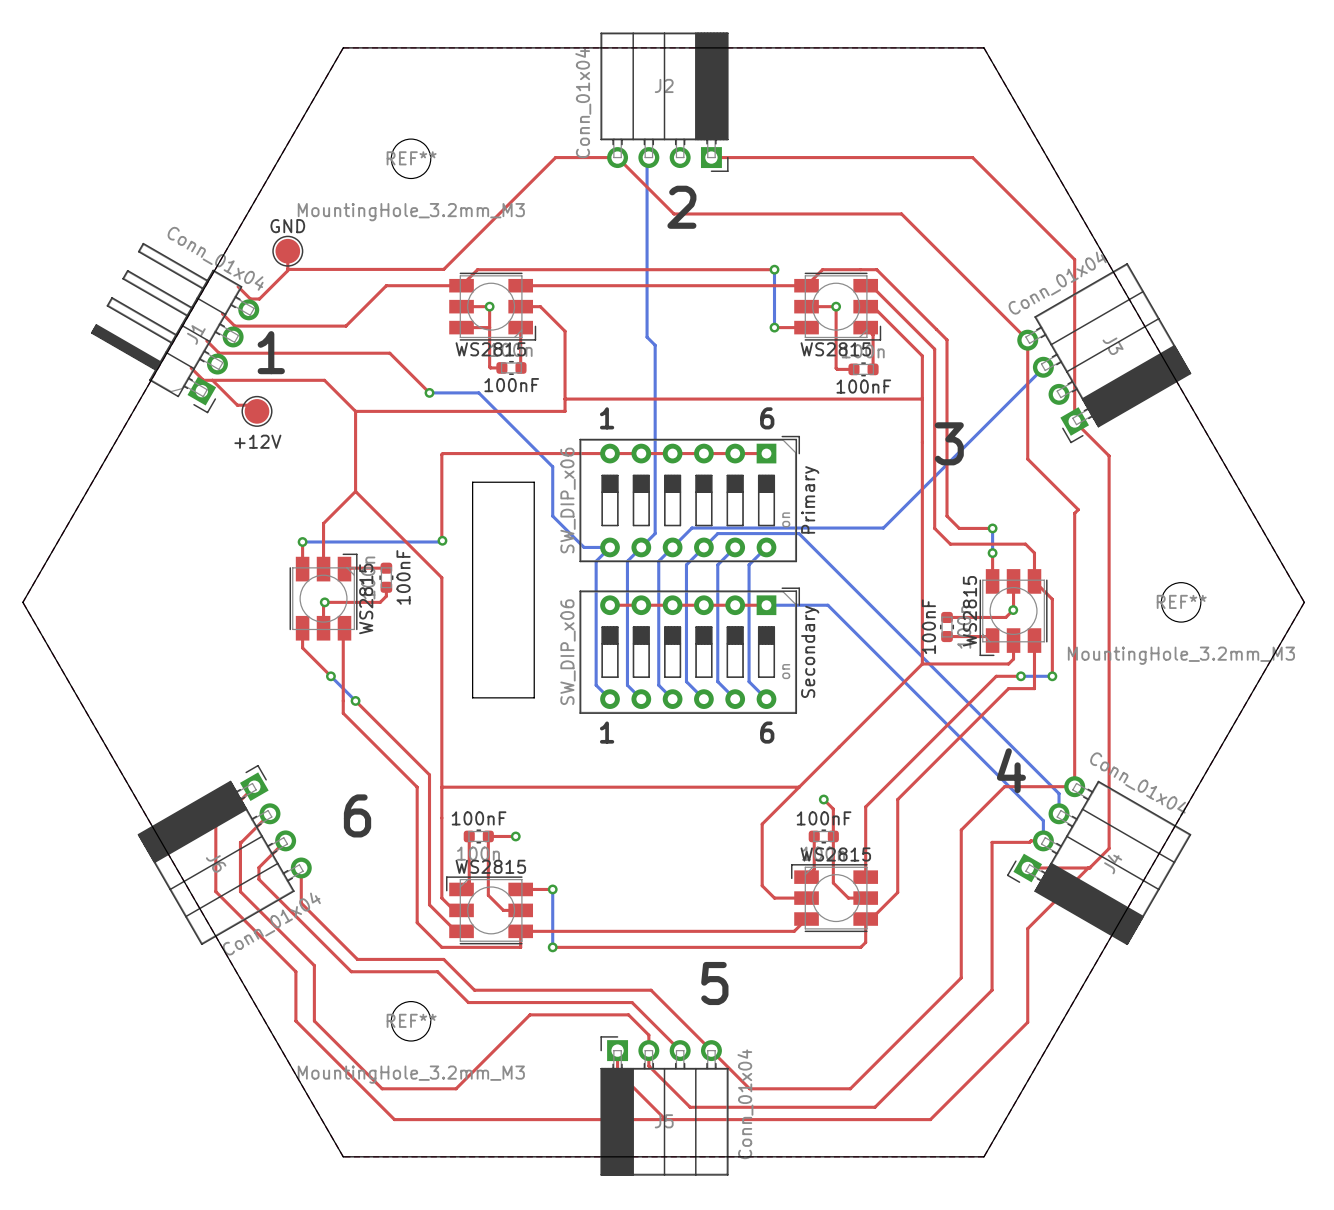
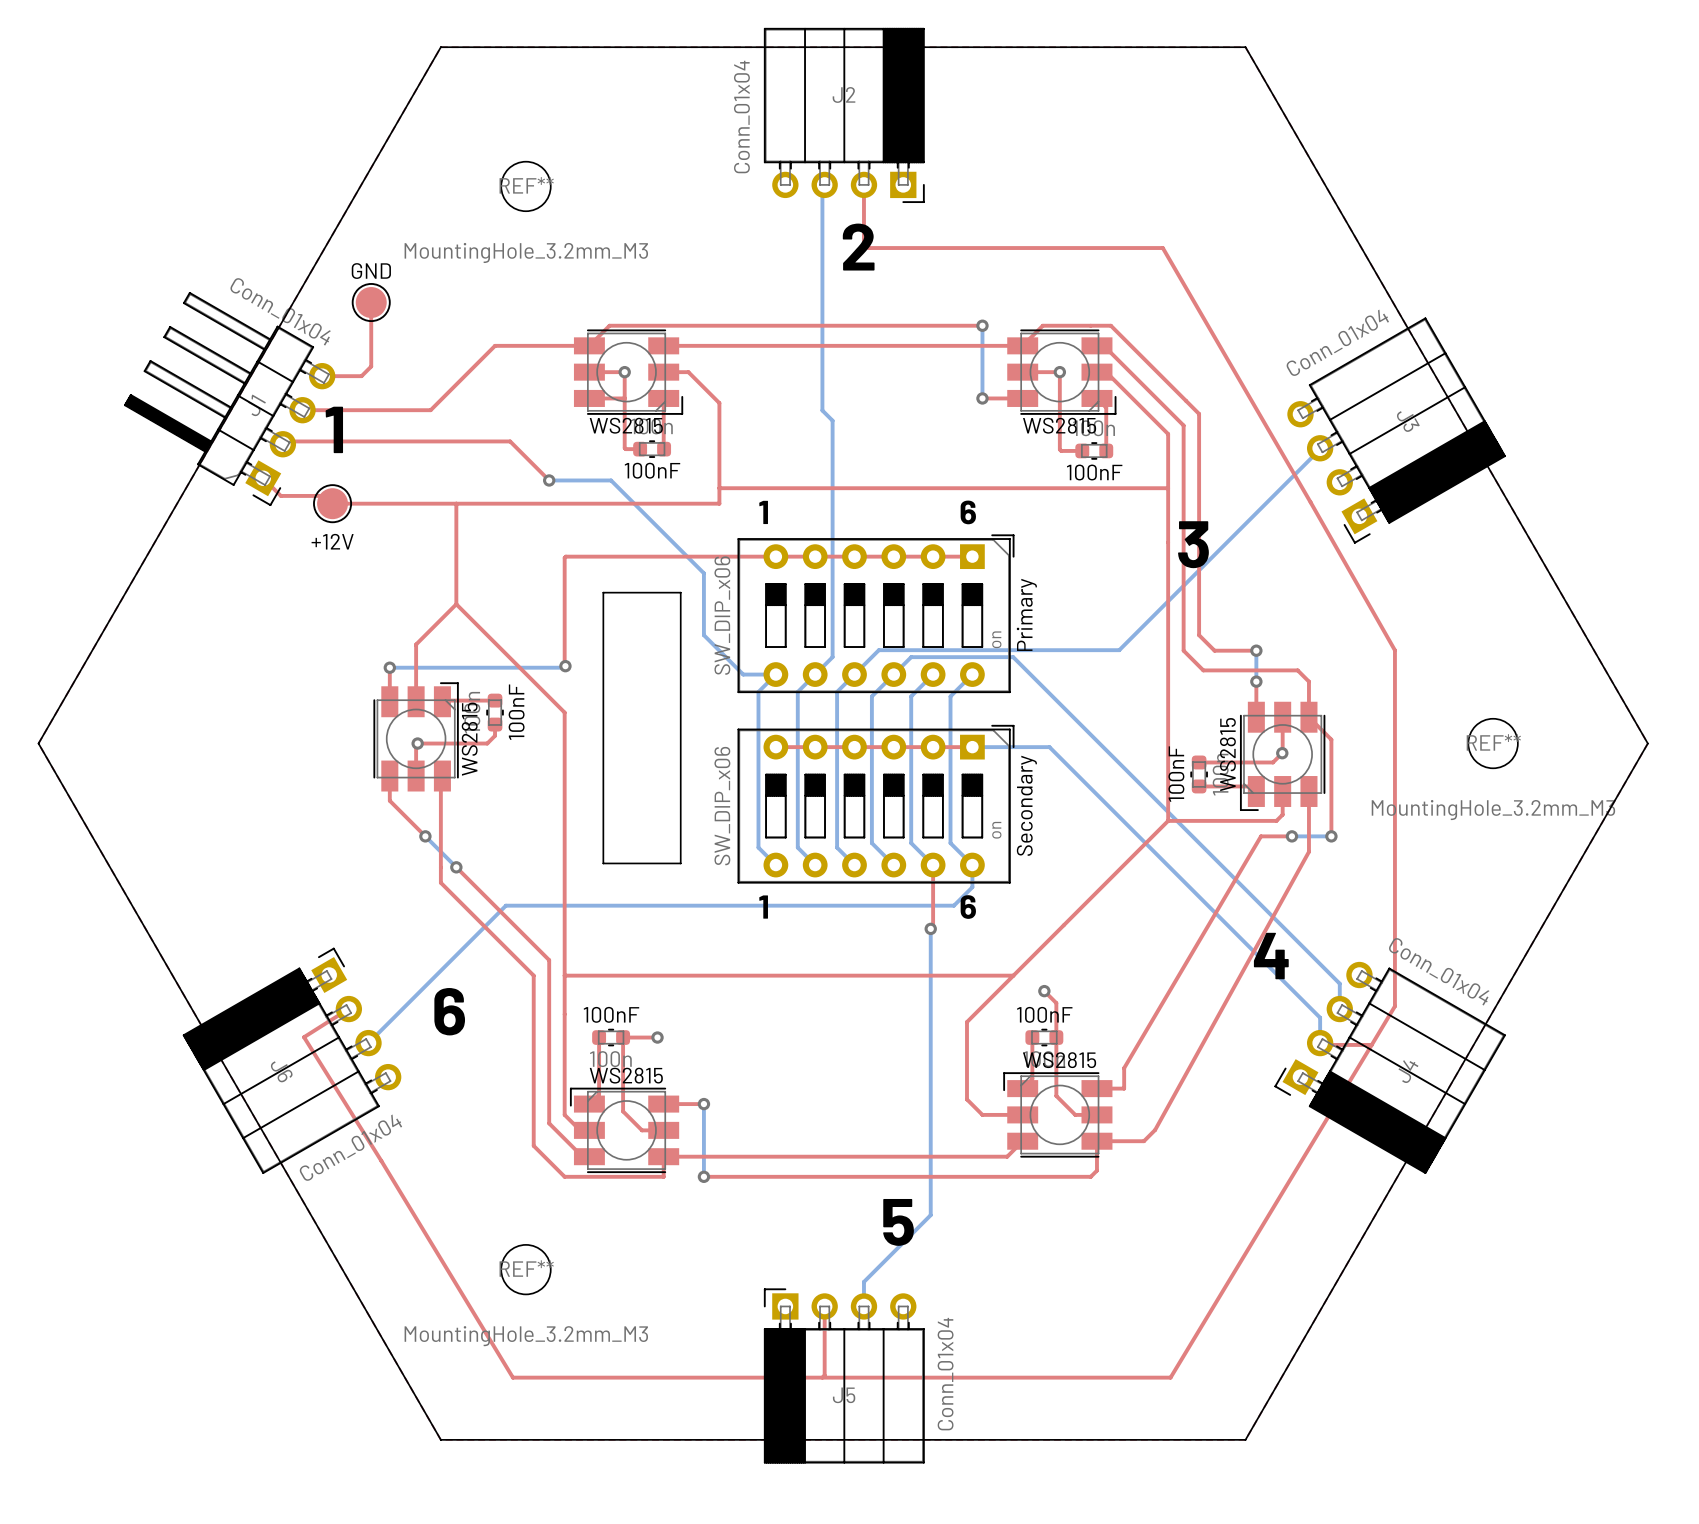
top track: none -> (863, 184) (863, 243) (868, 248) (1162, 248) (1394, 650) (1394, 1006) (1371, 1044)
top track: (711, 157) (972, 157) (1074, 259) (1074, 421) (1109, 455) (1109, 848) (1089, 868) (1027, 868) -> none
top track: (287, 269) (443, 269) (555, 157) (617, 157) (673, 213) (901, 213) (1027, 340) (1027, 459) (1078, 509) (1074, 513) (1074, 786) (1004, 786) (961, 830) (961, 977) (850, 1088) (749, 1088) (651, 990) (474, 990) (443, 959) (357, 959) (301, 903) (301, 868) -> none
top track: (287, 270) (259, 299) (250, 299) (238, 286) -> (371, 326) (371, 366) (361, 376) (322, 376)
top track: (222, 313) (234, 326) (345, 326) -> (302, 410) (430, 410) (444, 396)
top track: (206, 340) (219, 353) (389, 353) (398, 361) -> (282, 444) (285, 441) (510, 441)
top track: (191, 367) (203, 380) (324, 380) (355, 411) -> (332, 503) (456, 503)
top track: (212, 380) (237, 405) -> (263, 478) (280, 495) (307, 495)
top track: (996, 676) (865, 806) (865, 877) -> (1261, 836) (1124, 1068) (1124, 1088) (1101, 1088)
top track: (1034, 688) (1008, 688) (897, 799) (897, 892) (871, 919) -> (1308, 851) (1155, 1130) (1143, 1141) (1103, 1141)
top track: none -> (933, 865) (933, 926) (930, 928)
bottom track: none -> (972, 869) (972, 887) (953, 905) (505, 905) (368, 1043)
bottom track: none -> (930, 928) (930, 1215) (863, 1281) (863, 1306)
via: none -> (930, 928)
top track: (254, 786) (215, 823) (215, 891) (295, 971) (295, 1021) (394, 1119) (930, 1119) (1027, 1022) (1027, 928) (1088, 868) -> none
top track: (269, 813) (240, 842) (240, 891) (314, 965) (314, 1021) (382, 1088) (456, 1088) (530, 1014) (628, 1014) (648, 1035) (648, 1050) -> (348, 1009) (304, 1037) (512, 1377) (876, 1377)
top track: (285, 840) (258, 867) (258, 879) (351, 971) (437, 971) (468, 1002) (632, 1002) (680, 1050) -> none
top track: (1043, 840) (992, 842) (992, 990) (875, 1107) -> (1371, 1044) (1170, 1377) (1108, 1377)
top track: none -> (1320, 1043) (1321, 1044) (1371, 1044)
top track: (617, 1050) (617, 1071) (665, 1119) -> none
top track: (648, 1065) (690, 1107) -> (824, 1325) (824, 1375) (822, 1377)

